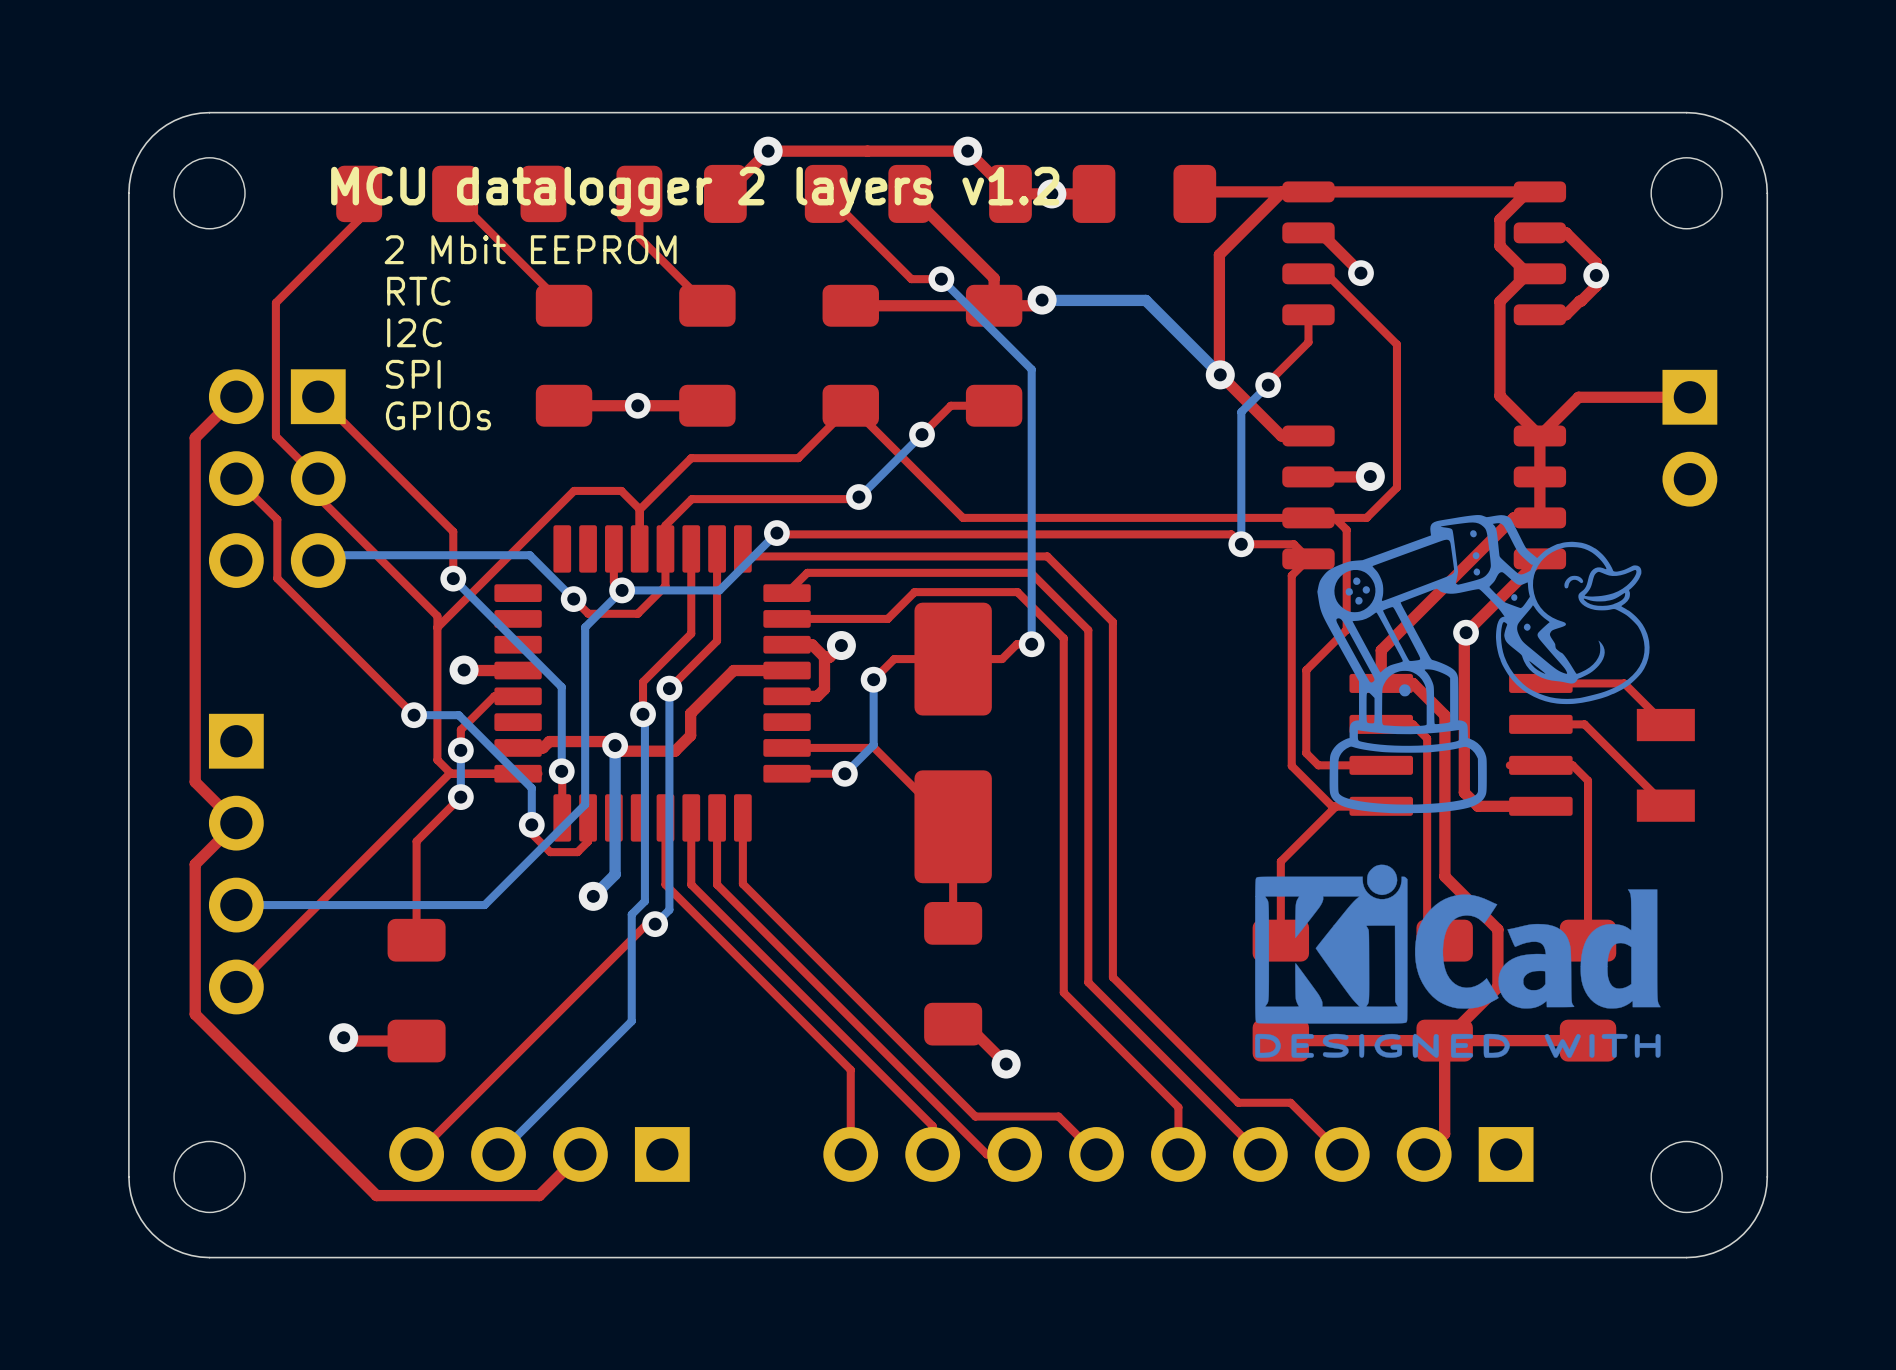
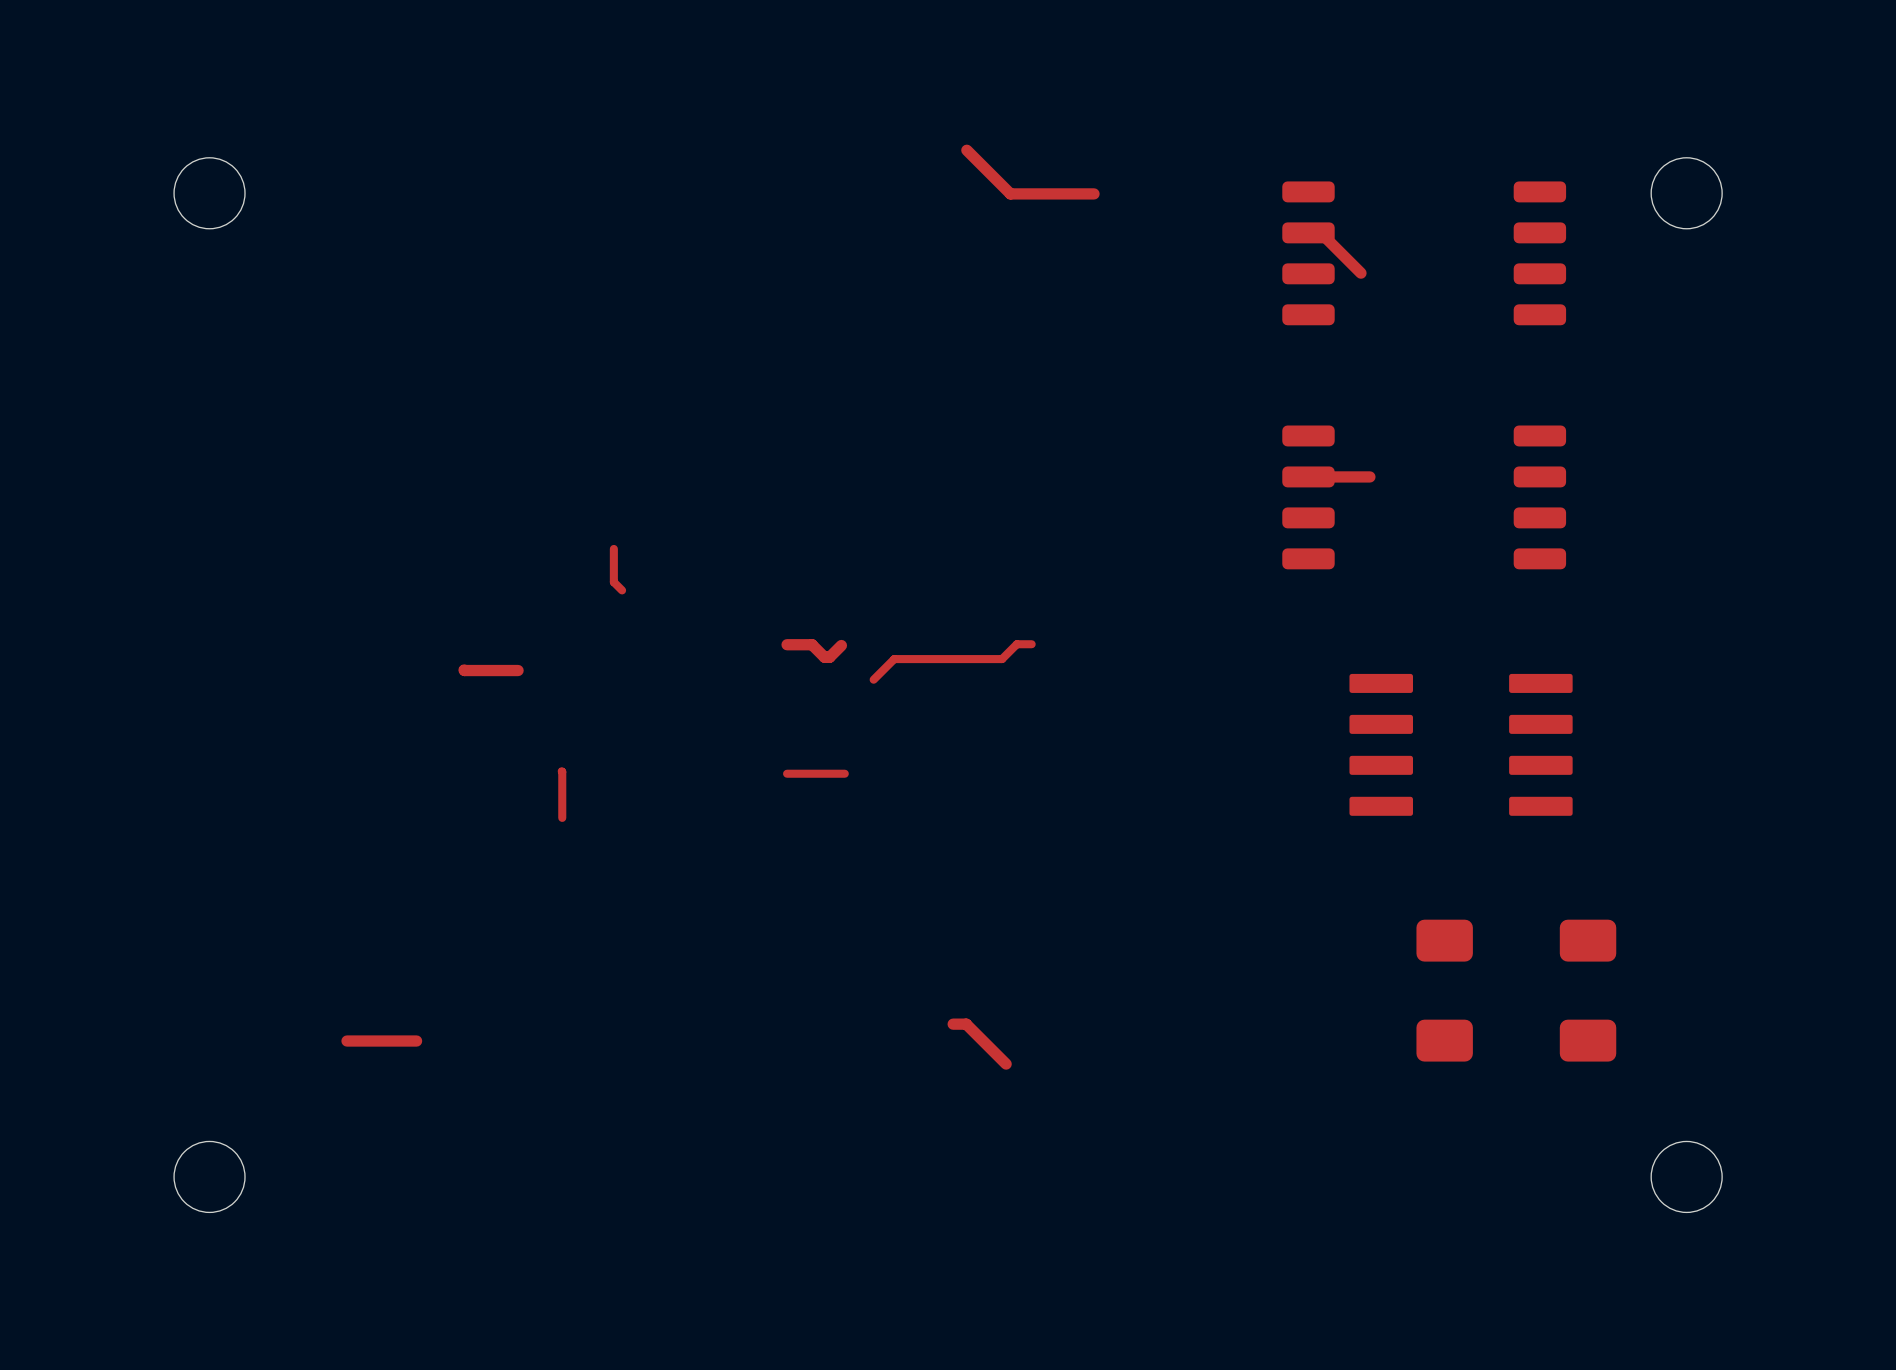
board edge: (1686, 112) (209, 112) (182, 117) (159, 130) (146, 143) (136, 158) (130, 175) (128, 193) (128, 1176) (133, 1203) (146, 1227) (159, 1239) (174, 1249) (191, 1255) (209, 1257) (1686, 1257) (1713, 1253) (1736, 1239) (1749, 1227) (1759, 1211) (1765, 1194) (1767, 1176) (1767, 193) (1762, 166) (1754, 150) (1743, 136) (1729, 125) (1713, 117) (1686, 112) -> none
via: (768, 151) -> none
top track: (967, 151) (768, 151) (725, 193) (735, 204) -> none
via: (967, 151) -> none
text: MCU datalogger 2 layers v1.2 (695, 191) -> none
top track: (1282, 191) (1219, 254) (1219, 373) (1281, 435) (1308, 435) -> none
top track: (1527, 191) (1499, 219) (1499, 246) (1527, 273) -> none
top track: (1539, 191) (1196, 191) (1194, 193) -> none
top track: (359, 193) (359, 219) (275, 302) (275, 436) (318, 478) (318, 497) (437, 616) (437, 760) (451, 773) -> none
part: (407, 193) -> none
top track: (455, 193) (455, 196) (564, 305) -> none
part: (591, 193) -> none
top track: (639, 193) (639, 237) (707, 305) -> none
part: (775, 193) -> none
top track: (909, 193) (994, 278) (994, 305) -> none
part: (960, 193) -> none
via: (1051, 193) -> none
part: (1144, 193) -> none
top track: (826, 199) (826, 193) (911, 279) (941, 279) -> none
top track: (1539, 232) (1566, 232) (1596, 262) (1596, 286) (1581, 301) (1566, 314) (1539, 314) -> none
text: 2 Mbit EEPROM (530, 249) -> none
top track: (1308, 273) (1326, 273) (1396, 344) (1396, 487) (1366, 517) (962, 517) (850, 405) (798, 458) (691, 458) (639, 509) -> none
via: (1360, 273) -> none
top track: (1527, 273) (1499, 301) (1499, 396) (1539, 435) -> none
via: (1596, 275) -> none
bottom track: (941, 279) (1031, 369) (1031, 644) -> none
via: (941, 279) -> none
text: RTC (418, 291) -> none
top track: (1042, 300) (1036, 305) (850, 305) -> none
bottom track: (1042, 300) (1145, 300) (1220, 374) -> none
via: (1042, 300) -> none
top track: (1308, 314) (1308, 342) (1268, 382) (1268, 385) -> none
text: I2C (414, 332) -> none
part: (564, 355) -> none
part: (707, 355) -> none
part: (850, 355) -> none
part: (994, 355) -> none
text: SPI (413, 374) -> none
via: (1220, 374) -> none
bottom track: (1268, 385) (1241, 412) (1241, 544) -> none
via: (1268, 385) -> none
top track: (236, 396) (195, 437) (195, 781) (236, 823) (195, 864) (195, 1014) (376, 1195) (539, 1195) (580, 1154) -> none
top track: (318, 396) (453, 531) (453, 578) -> none
top track: (1689, 397) (1578, 397) (1539, 435) -> none
via: (637, 405) -> none
top track: (707, 405) (564, 405) -> none
top track: (994, 405) (950, 405) (922, 434) -> none
text: GPIOs (438, 415) -> none
bottom track: (922, 434) (858, 497) -> none
via: (922, 434) -> none
top track: (1539, 435) (1539, 517) (1513, 517) (1381, 650) (1381, 683) (1413, 683) (1444, 715) (1444, 876) (1497, 929) (1497, 987) (1444, 1040) (1444, 1133) (1424, 1154) -> none
part: (1689, 438) -> none
via: (1370, 476) -> none
top track: (236, 478) (277, 519) (277, 578) (414, 715) -> none
part: (277, 478) -> none
top track: (858, 497) (856, 499) (691, 499) (665, 525) (665, 586) (637, 613) (588, 613) (573, 599) -> none
via: (858, 497) -> none
drawing: [1317, 515, 1650, 814] -> none
top track: (1334, 517) (1346, 529) (1346, 629) (1306, 670) (1306, 753) (1318, 765) (1350, 765) -> none
top track: (776, 533) (1231, 534) (1241, 544) (1293, 544) (1308, 558) (1291, 575) (1291, 765) (1332, 806) (1350, 806) -> none
bottom track: (776, 533) (719, 590) (622, 590) (585, 627) (585, 804) (484, 905) (236, 905) -> none
via: (776, 533) -> none
via: (1241, 544) -> none
top track: (639, 548) (639, 509) (621, 490) (574, 490) (437, 627) -> none
top track: (691, 548) (691, 633) (643, 681) (643, 714) -> none
top track: (717, 548) (717, 640) (669, 688) -> none
top track: (742, 548) (750, 556) (1047, 556) (1112, 621) (1112, 977) (1238, 1102) (1290, 1102) (1342, 1154) -> none
top track: (1539, 558) (1464, 634) (1464, 792) (1478, 806) (1509, 806) -> none
bottom track: (318, 560) (323, 555) (529, 555) (573, 599) -> none
bottom track: (453, 578) (561, 687) (561, 771) -> none
via: (453, 578) -> none
via: (622, 590) -> none
top track: (787, 593) (807, 572) (1030, 572) (1088, 630) (1088, 982) (1260, 1154) (1238, 1154) -> none
via: (573, 599) -> none
top track: (787, 618) (887, 618) (914, 592) (1017, 592) (1063, 638) (1063, 992) (1178, 1107) (1178, 1154) -> none
via: (1466, 632) -> none
via: (1031, 644) -> none
via: (841, 645) -> none
top track: (824, 657) (824, 689) (817, 696) (787, 696) -> none
via: (464, 670) -> none
top track: (787, 670) (733, 670) (690, 713) (690, 735) (675, 751) (620, 751) (611, 741) (549, 741) (543, 747) (518, 747) -> none
bottom track: (873, 679) (873, 745) (844, 773) -> none
via: (873, 679) -> none
part: (652, 683) -> none
top track: (1540, 683) (1624, 683) (1665, 725) -> none
bottom track: (669, 688) (669, 909) (655, 924) -> none
via: (669, 688) -> none
top track: (518, 696) (494, 696) (460, 729) (460, 750) -> none
bottom track: (643, 714) (644, 716) (644, 901) (631, 914) (631, 1021) (498, 1154) -> none
via: (643, 714) -> none
bottom track: (414, 715) (458, 715) (531, 788) (531, 824) -> none
via: (414, 715) -> none
top track: (1381, 724) (1413, 724) (1427, 738) (1427, 923) (1444, 940) -> none
top track: (1540, 724) (1584, 724) (1665, 805) -> none
part: (953, 742) -> none
bottom track: (615, 745) (615, 874) (593, 896) -> none
via: (615, 745) -> none
top track: (787, 747) (874, 747) (953, 826) (953, 923) -> none
bottom track: (460, 750) (460, 797) -> none
via: (460, 750) -> none
top track: (1509, 765) (1572, 765) (1588, 780) (1588, 940) -> none
part: (1665, 765) -> none
via: (561, 771) -> none
top track: (538, 773) (449, 773) (236, 986) -> none
via: (844, 773) -> none
via: (460, 797) -> none
top track: (460, 805) (460, 797) (416, 841) (416, 940) -> none
top track: (1336, 806) (1280, 861) (1280, 940) -> none
top track: (588, 817) (588, 841) (577, 852) (550, 852) (531, 833) (531, 824) -> none
top track: (665, 817) (665, 884) (850, 1069) (850, 1136) -> none
top track: (691, 817) (691, 884) (932, 1126) (932, 1154) -> none
top track: (717, 817) (717, 884) (986, 1154) (1014, 1154) -> none
top track: (742, 817) (742, 884) (975, 1116) (1058, 1116) (1096, 1154) -> none
via: (531, 824) -> none
part: (236, 864) -> none
drawing: [1255, 864, 1661, 1058] -> none
via: (593, 896) -> none
top track: (655, 924) (646, 924) (416, 1154) -> none
via: (655, 924) -> none
part: (953, 973) -> none
part: (416, 990) -> none
part: (1280, 990) -> none
via: (343, 1037) -> none
top track: (1588, 1040) (1280, 1040) -> none
via: (1006, 1064) -> none
part: (539, 1154) -> none
part: (1178, 1154) -> none

